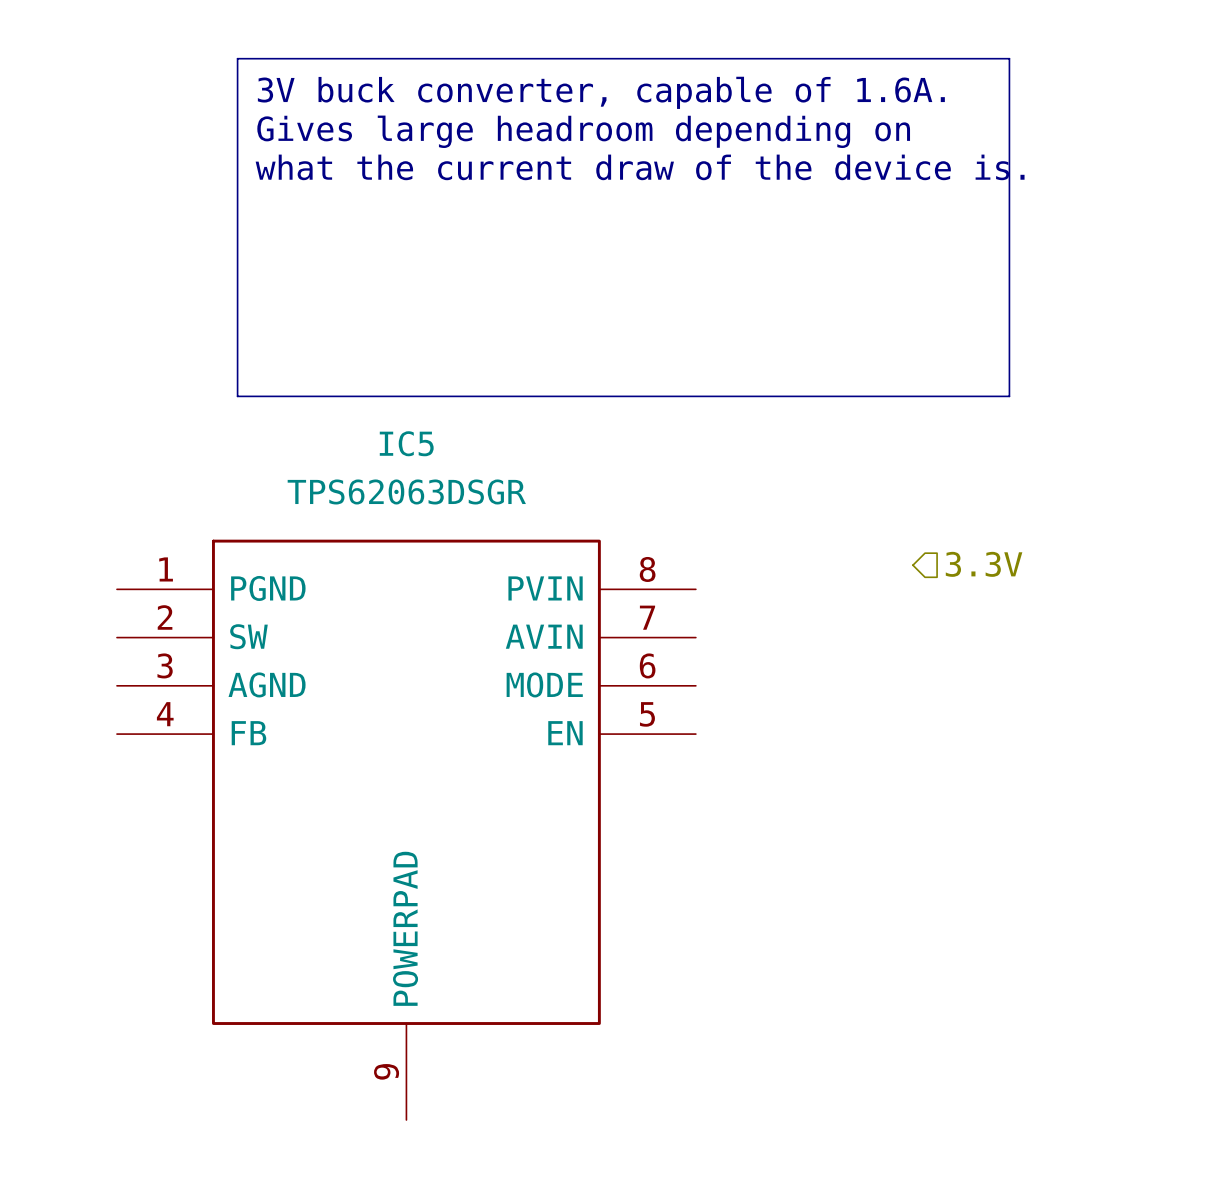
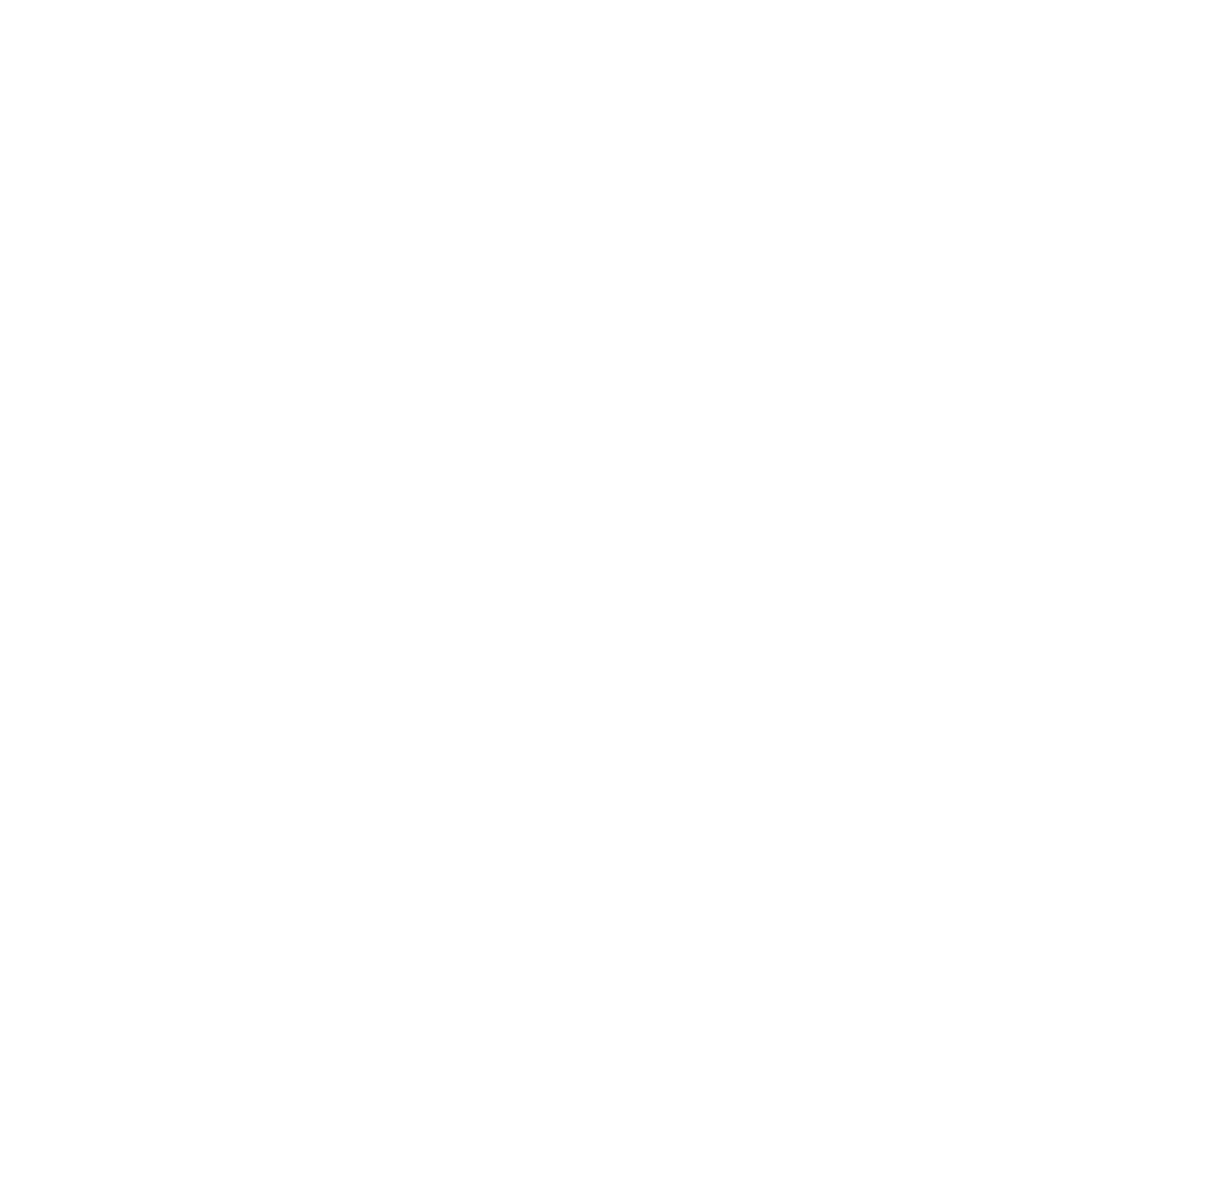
line: (237, 58) (1009, 58) (1009, 396) (237, 396) (237, 58) -> none
text: 3V buck converter, capable of 1.6A. (601, 92) -> none
text: Gives large headroom depending on (583, 131) -> none
text: what the current draw of the device is. (640, 167) -> none
hierarchical label: 3.3V (984, 564) -> none
IC5: TPS62063DSGR (406, 829) -> none

